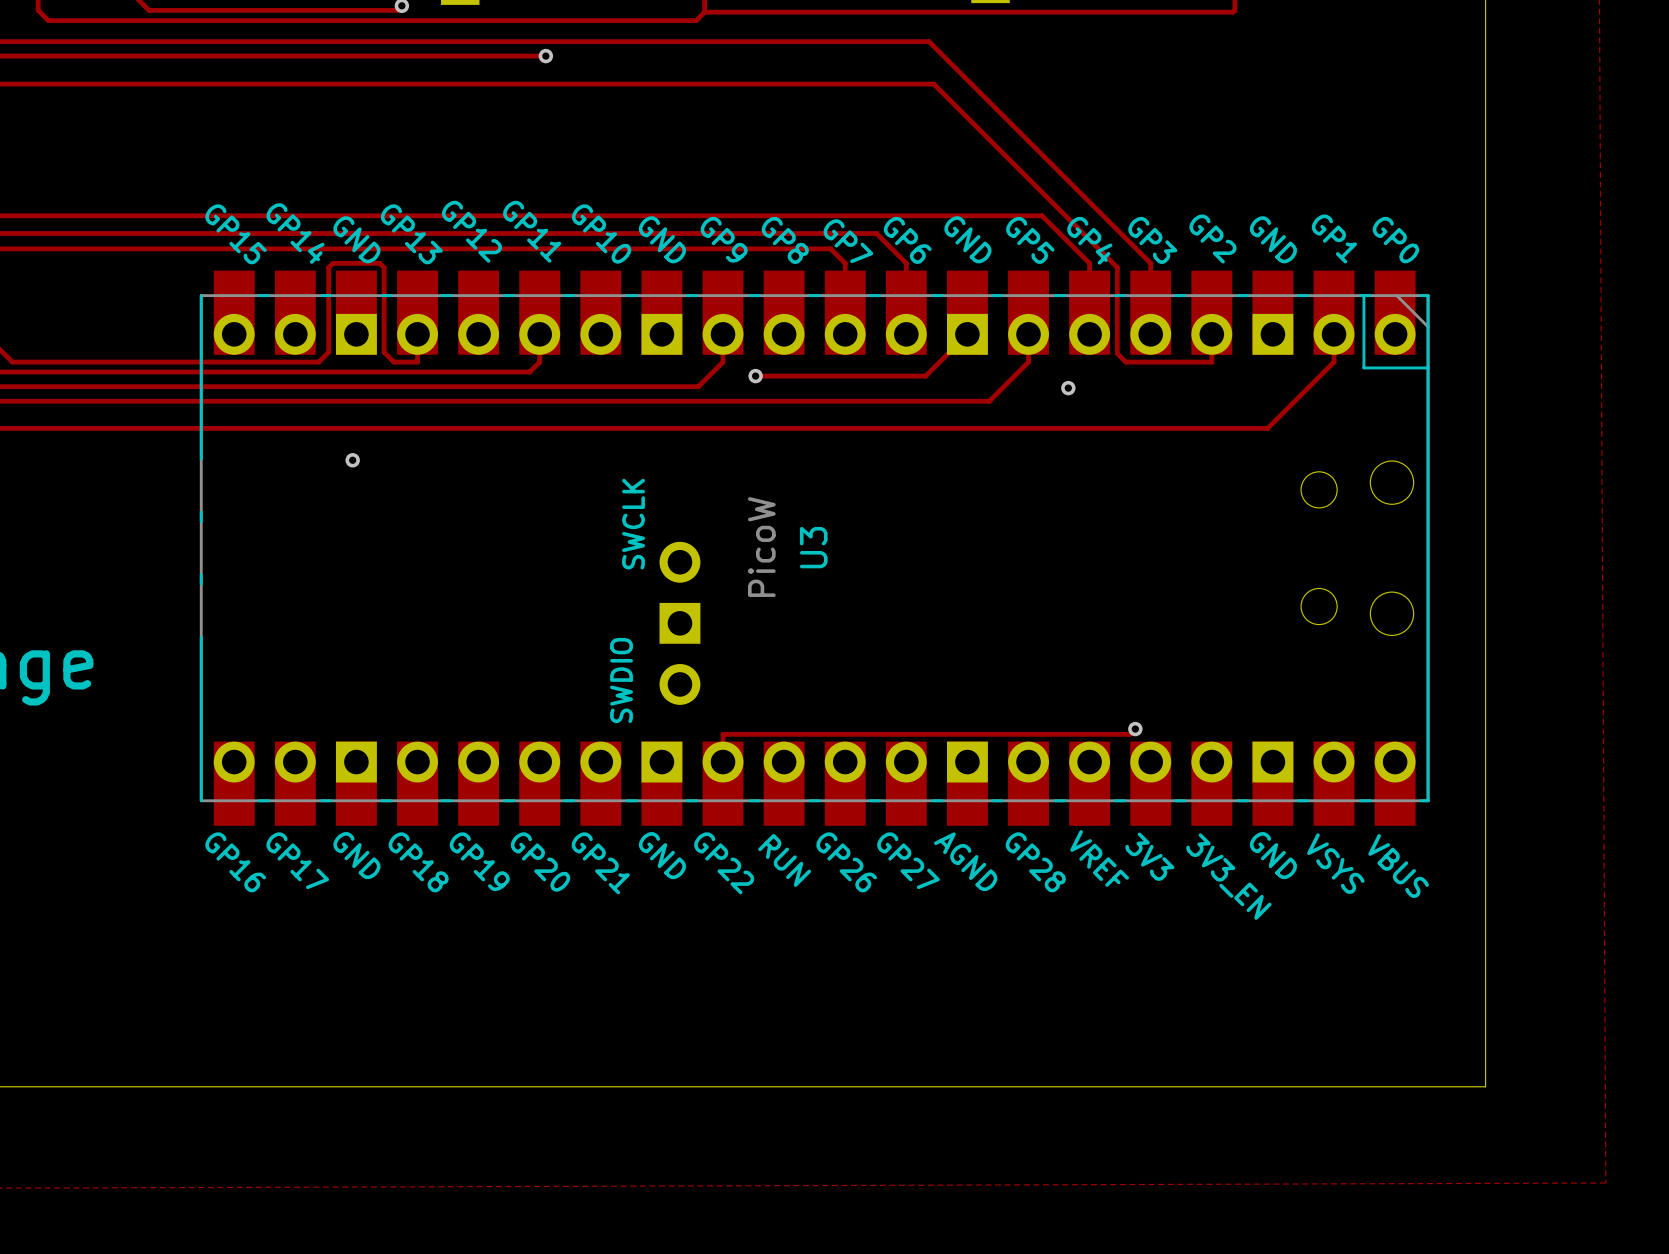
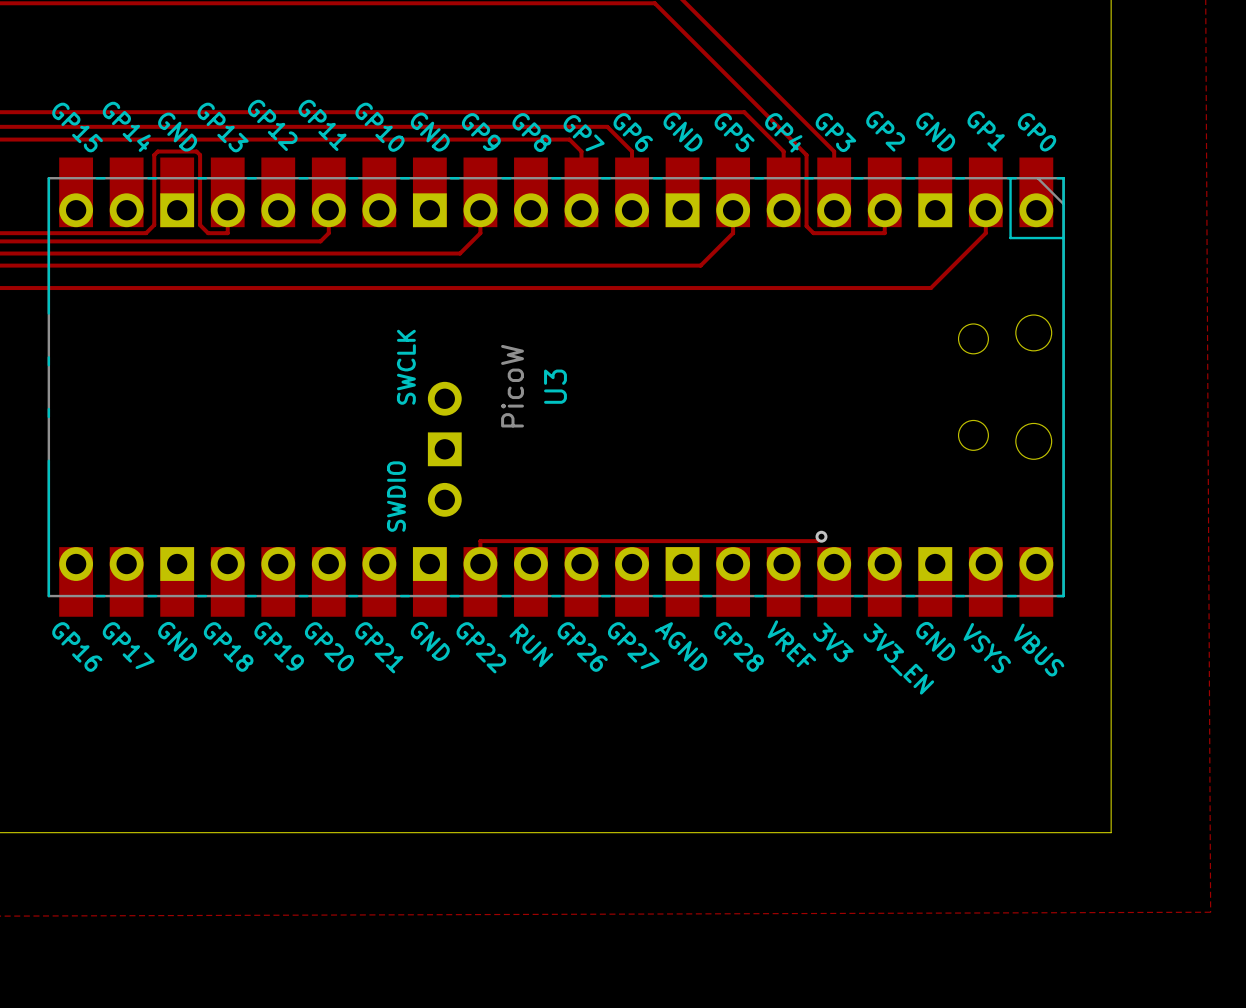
track: (967, 334) (925, 376) (755, 376) -> none
via: (755, 376) -> none
via: (1068, 388) -> none
via: (352, 460) -> none

